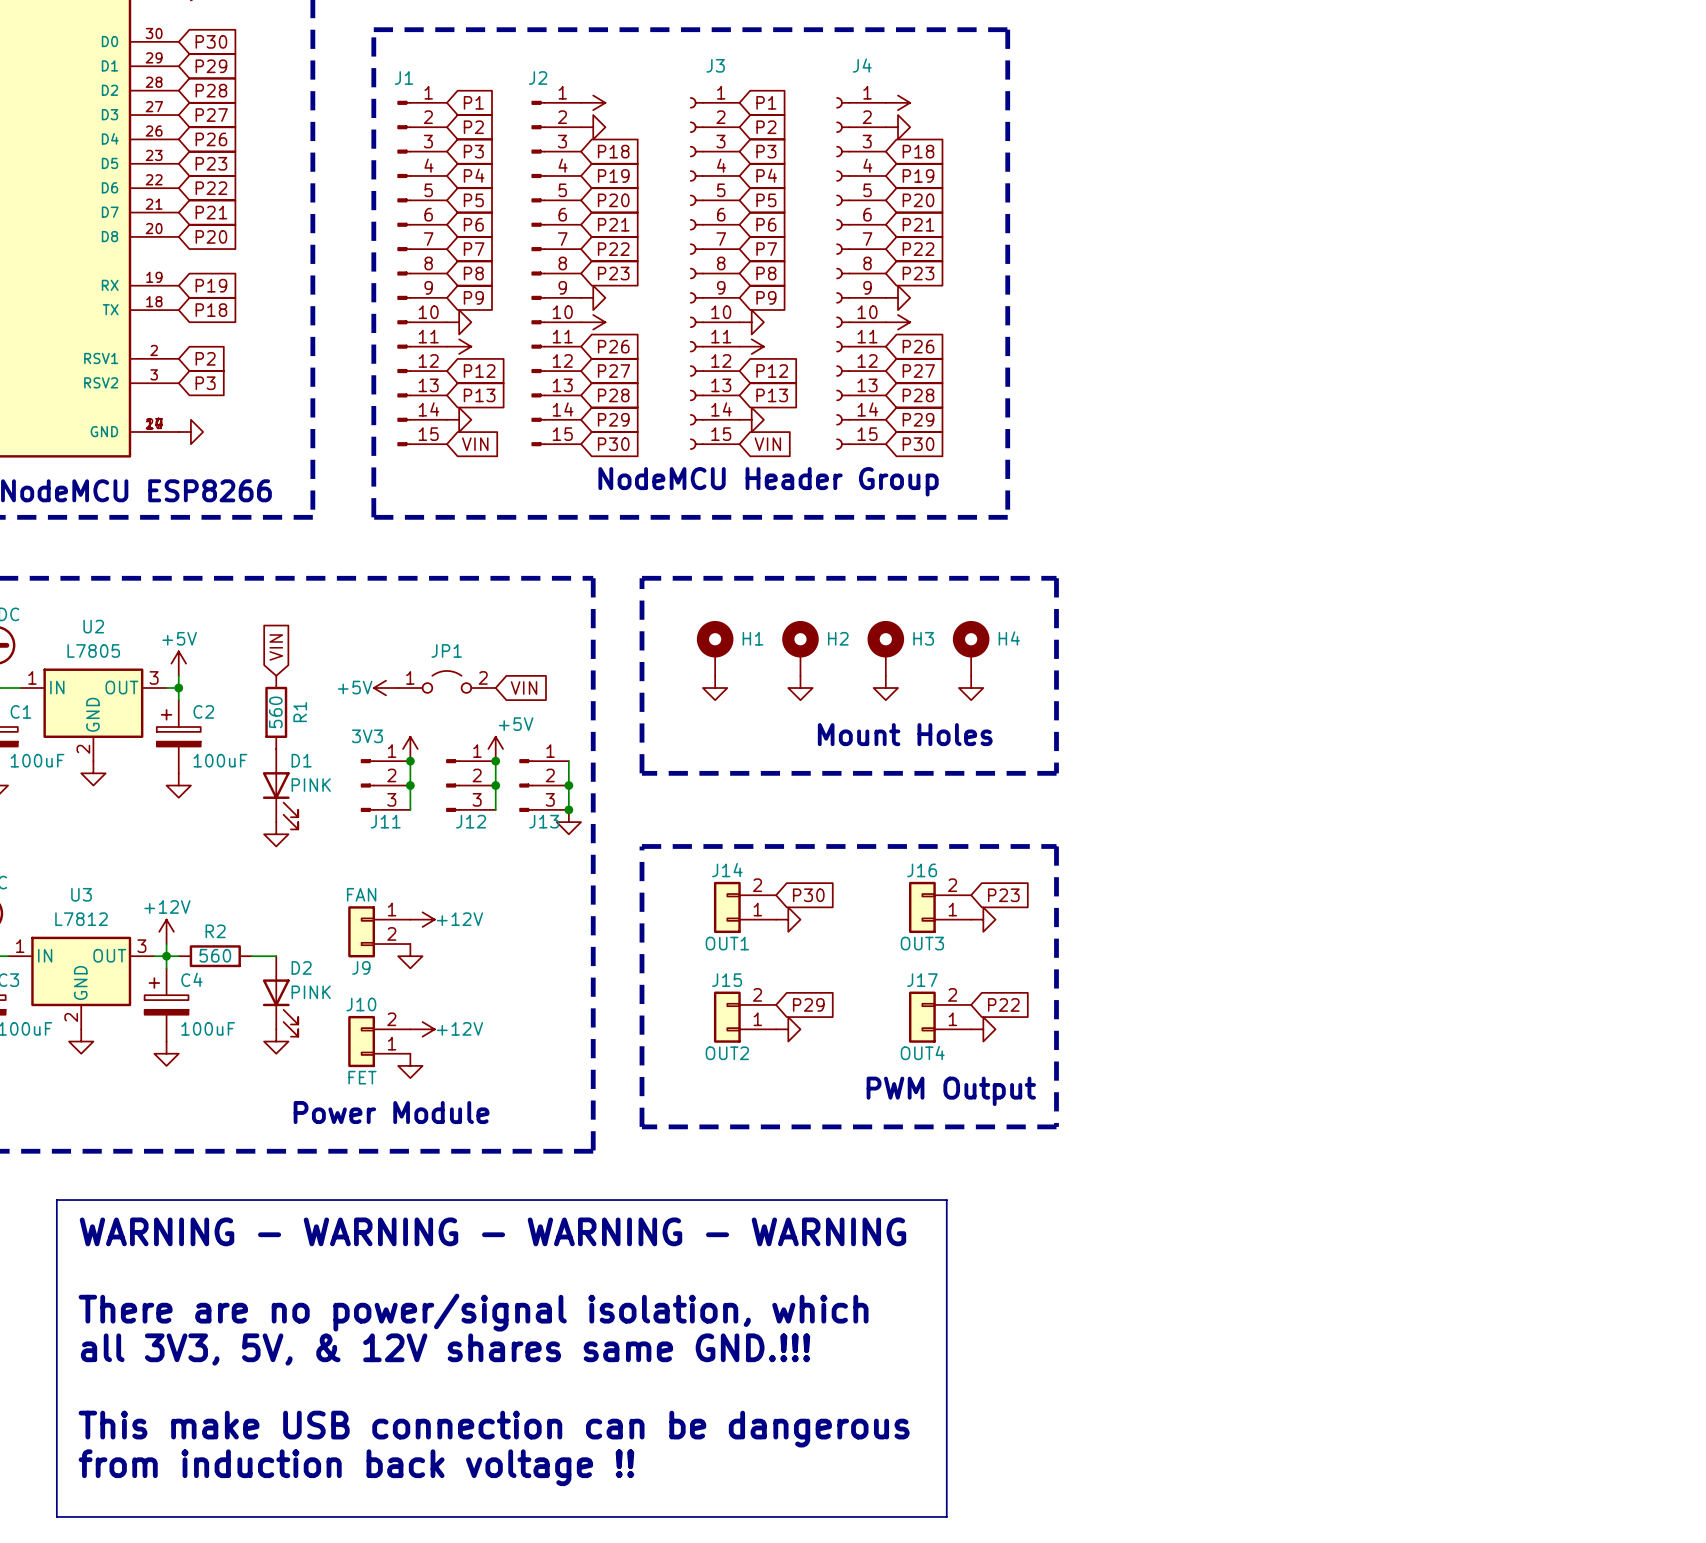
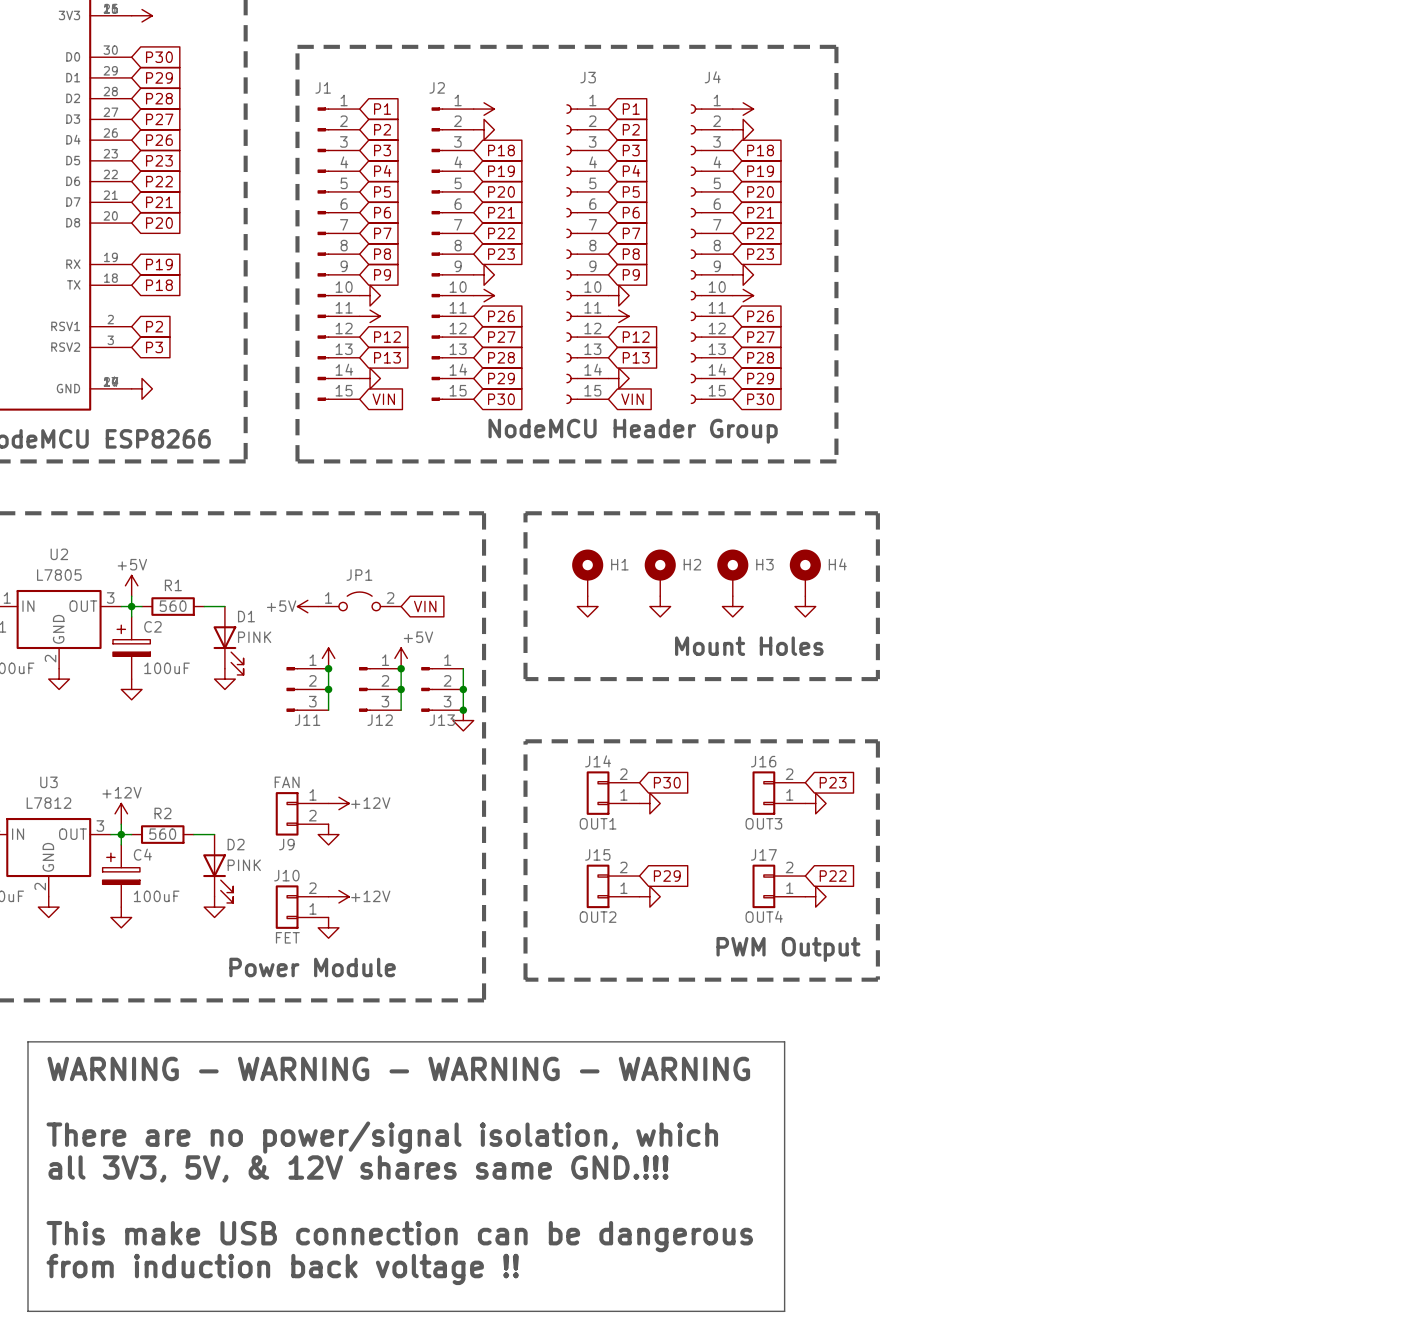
global label: VIN (276, 647) -> none
wire: none -> (131, 606) (142, 606)
R1 rotation: 0° (276, 712) -> 90° clockwise (173, 606)
R1 position: (276, 712) -> (173, 606)
R1 name position: R1 (300, 712) -> R1 (173, 585)
J11 value: 3V3 (367, 736) -> none
D1 position: (280, 789) -> (228, 640)
power symbol position: (276, 834) -> (224, 679)

